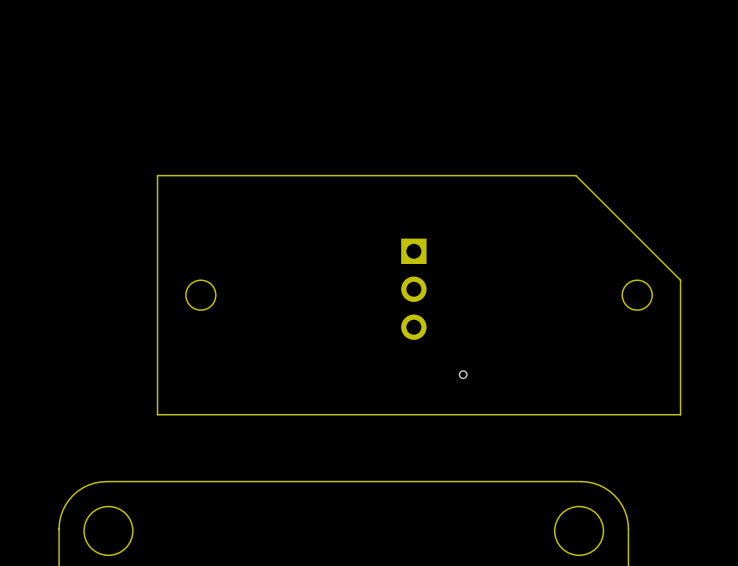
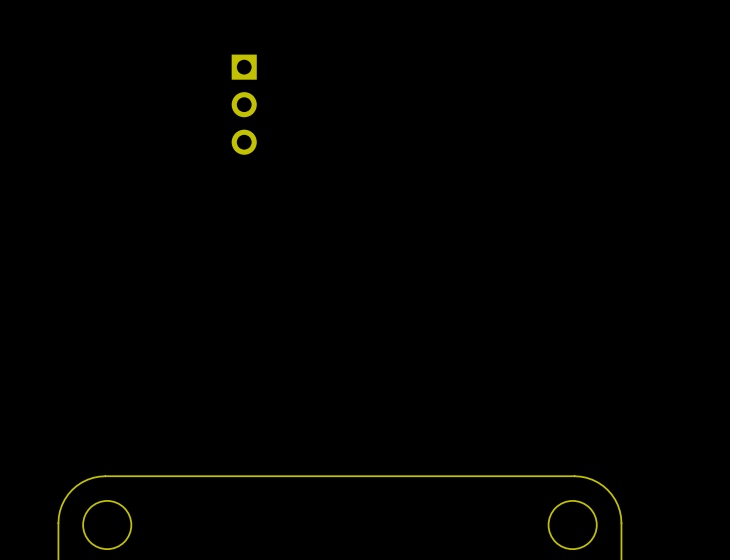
board edge: (575, 175) (157, 175) (157, 414) (680, 414) (680, 280) (575, 175) -> none
round board edge: [185, 279, 217, 311] -> none
round board edge: [621, 279, 653, 311] -> none
part position: (413, 289) -> (244, 104)
via: (463, 374) -> none

